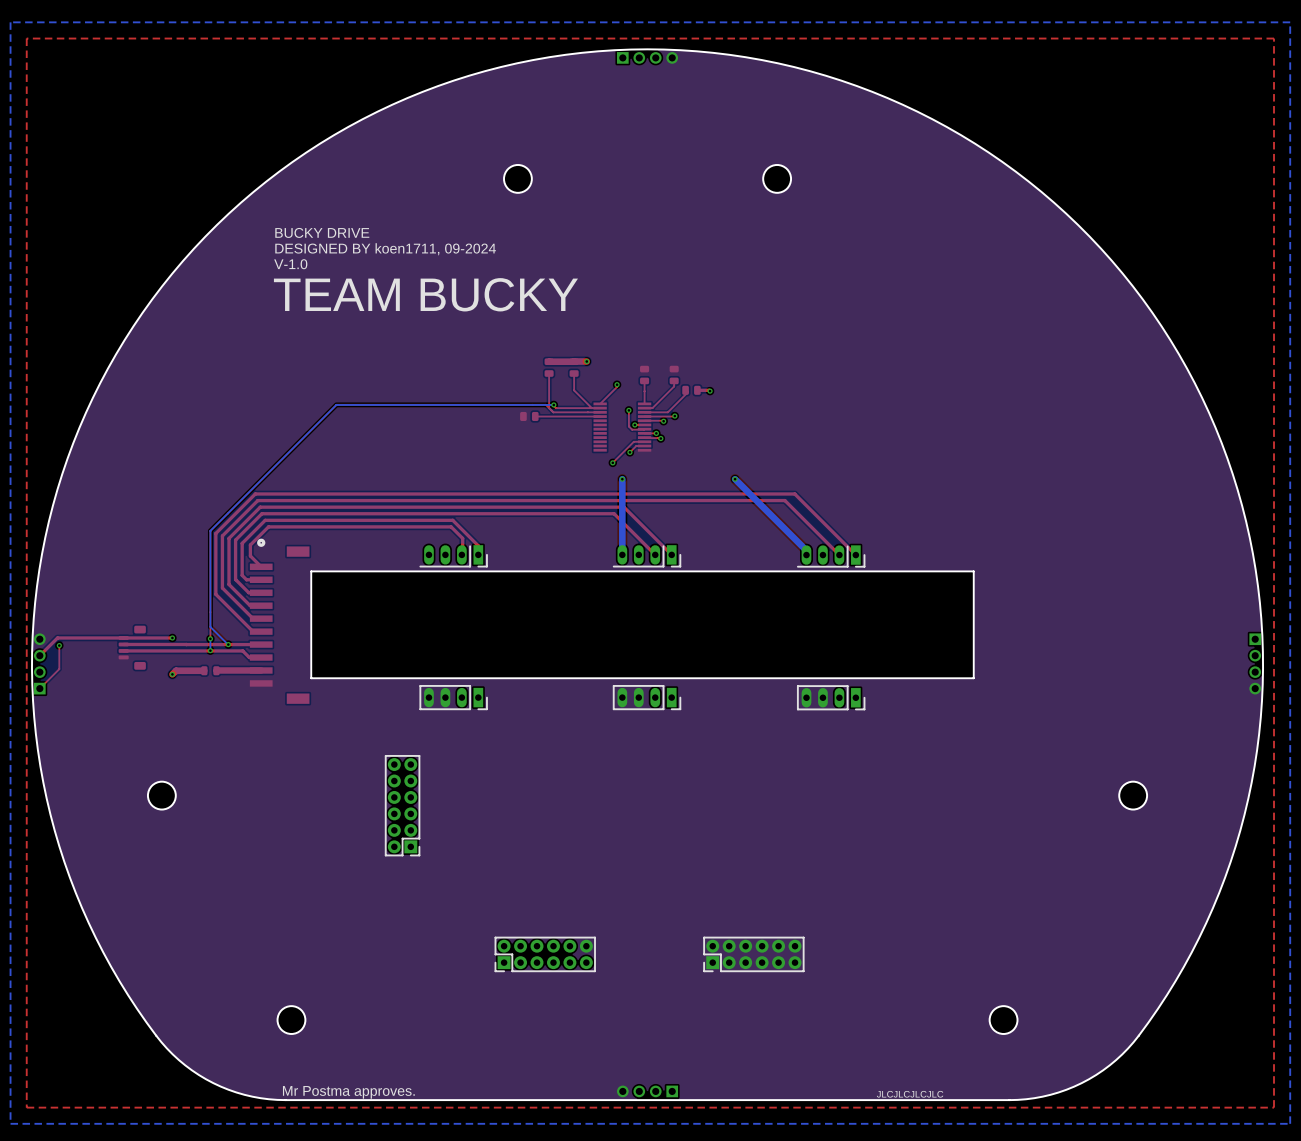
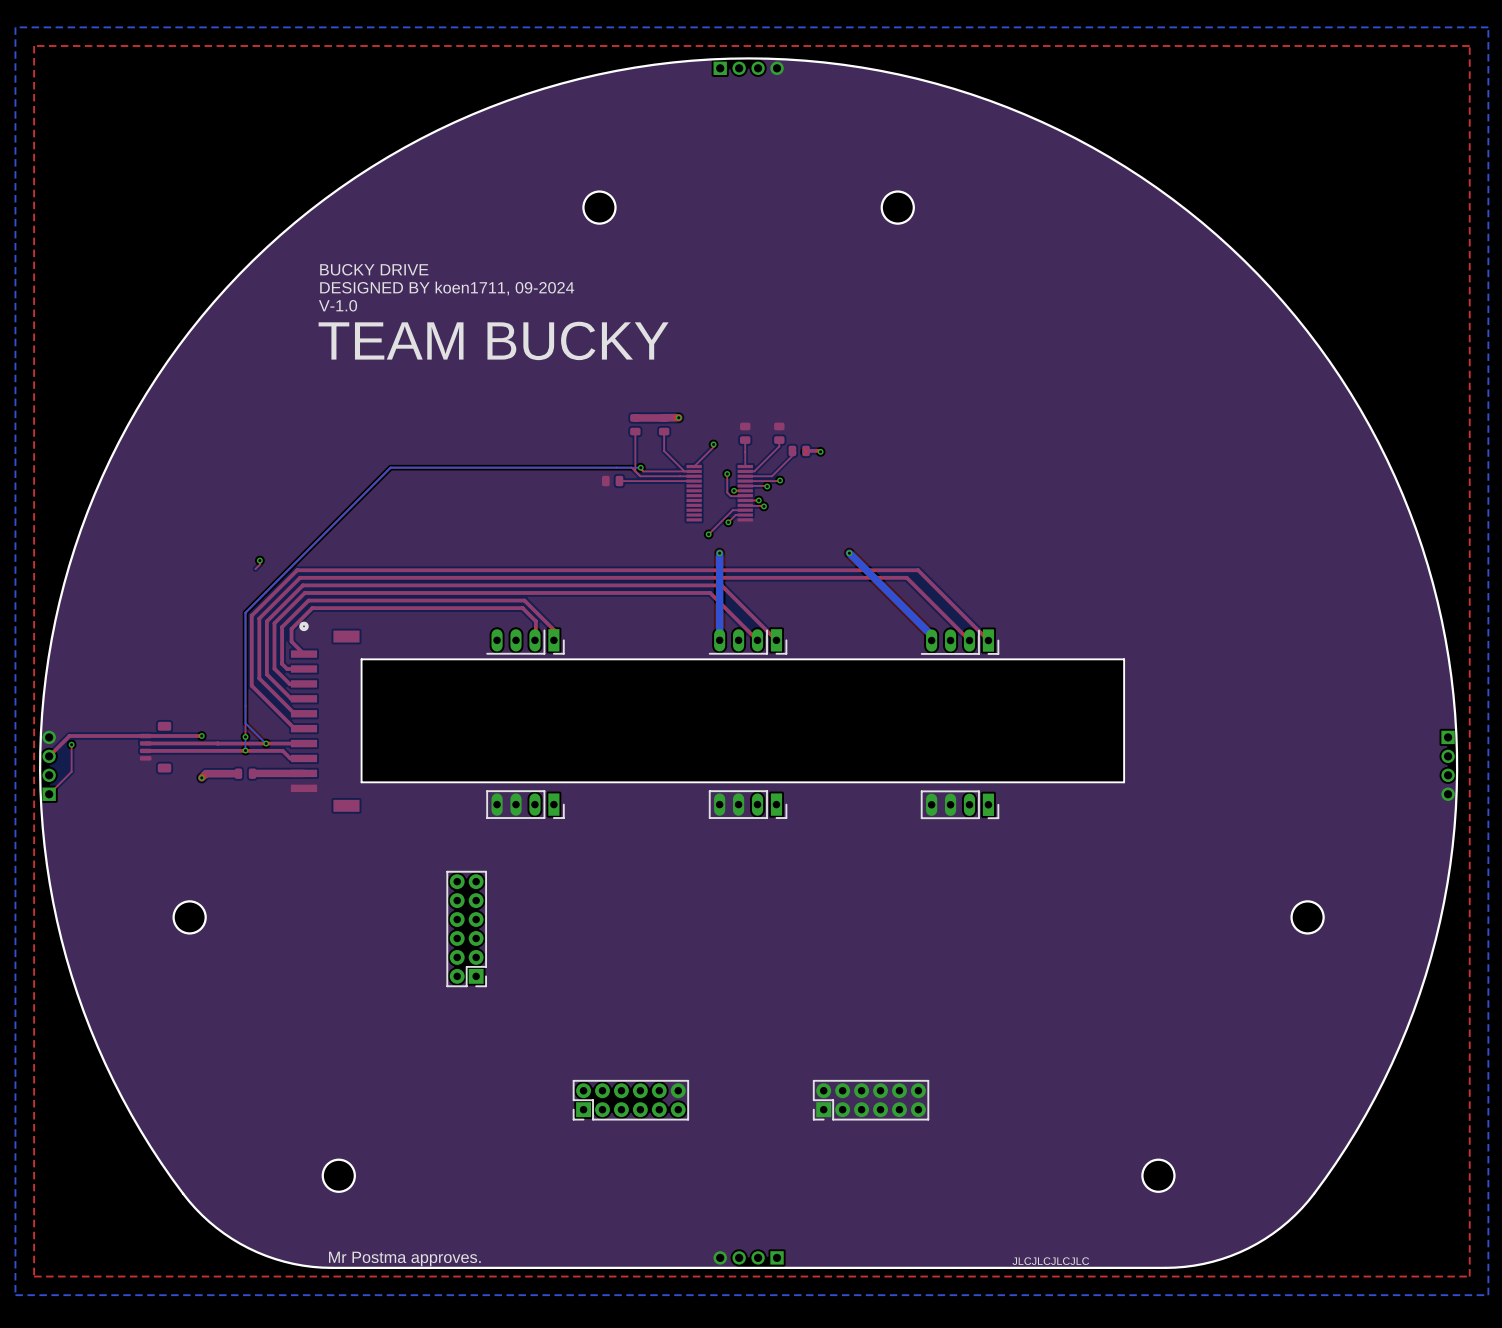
bottom track: none -> (803, 451) (803, 452)
top track: none -> (259, 560) (260, 564) (255, 568)
via: none -> (259, 560)

